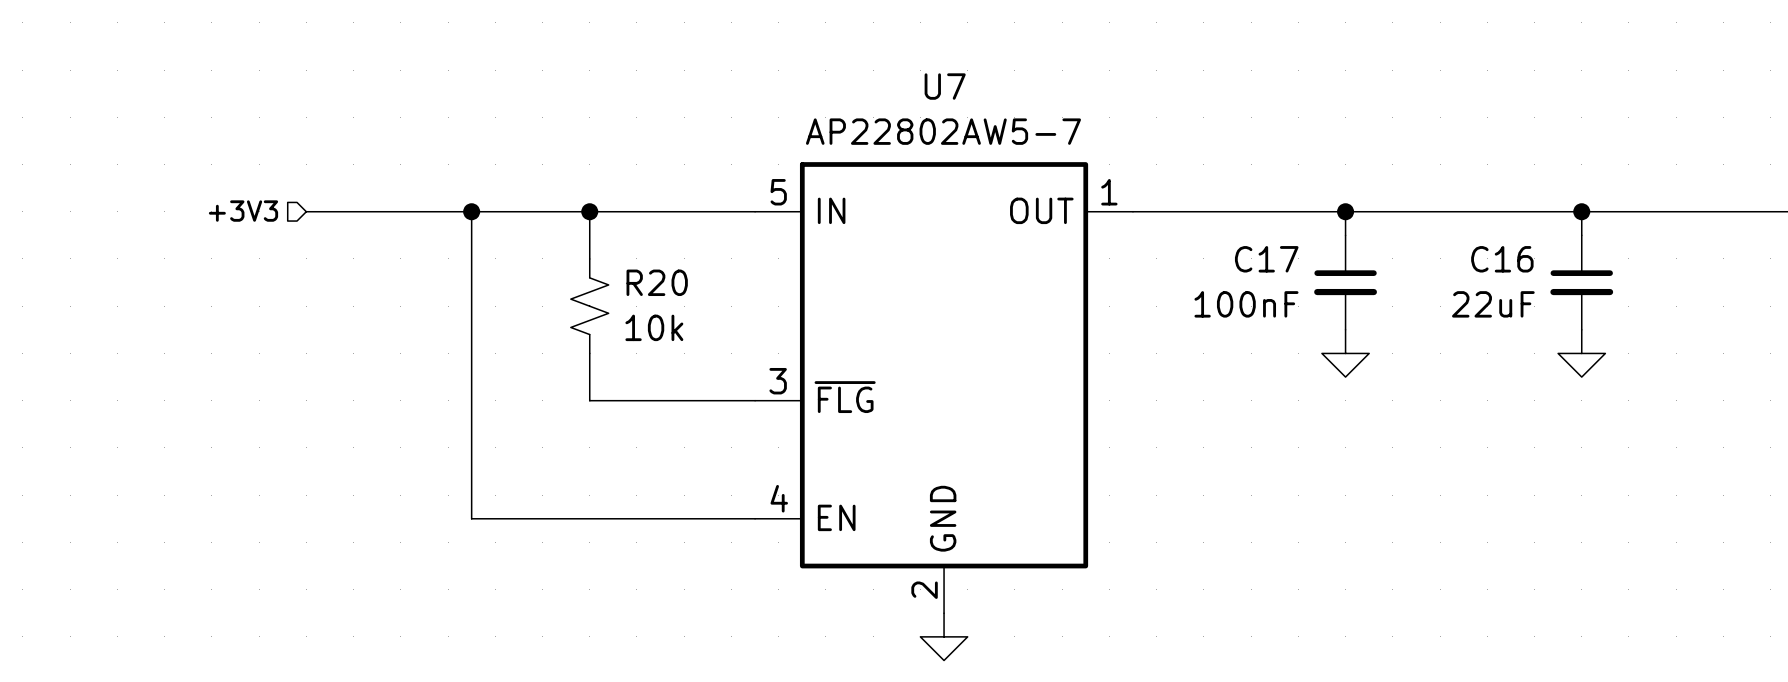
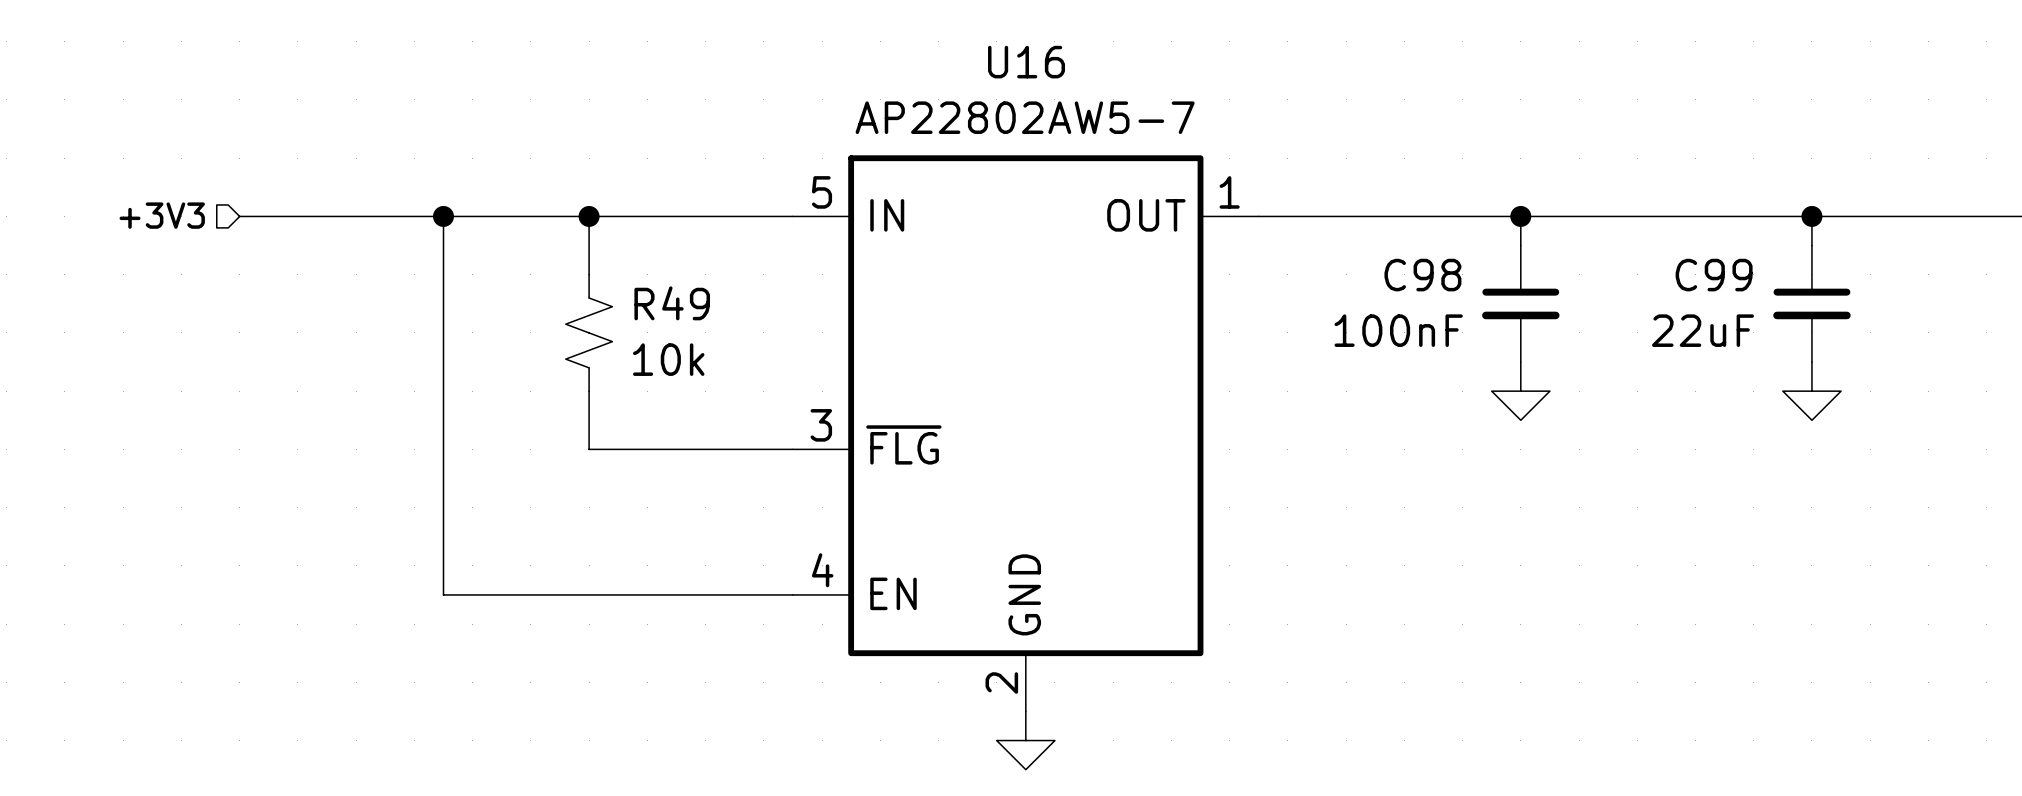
U7 name: U7 (945, 86) -> U16 (1026, 62)
C17 name: C17 (1266, 259) -> C98 (1422, 275)
C16 name: C16 (1502, 259) -> C99 (1714, 275)
R20 name: R20 (657, 282) -> R49 (672, 303)

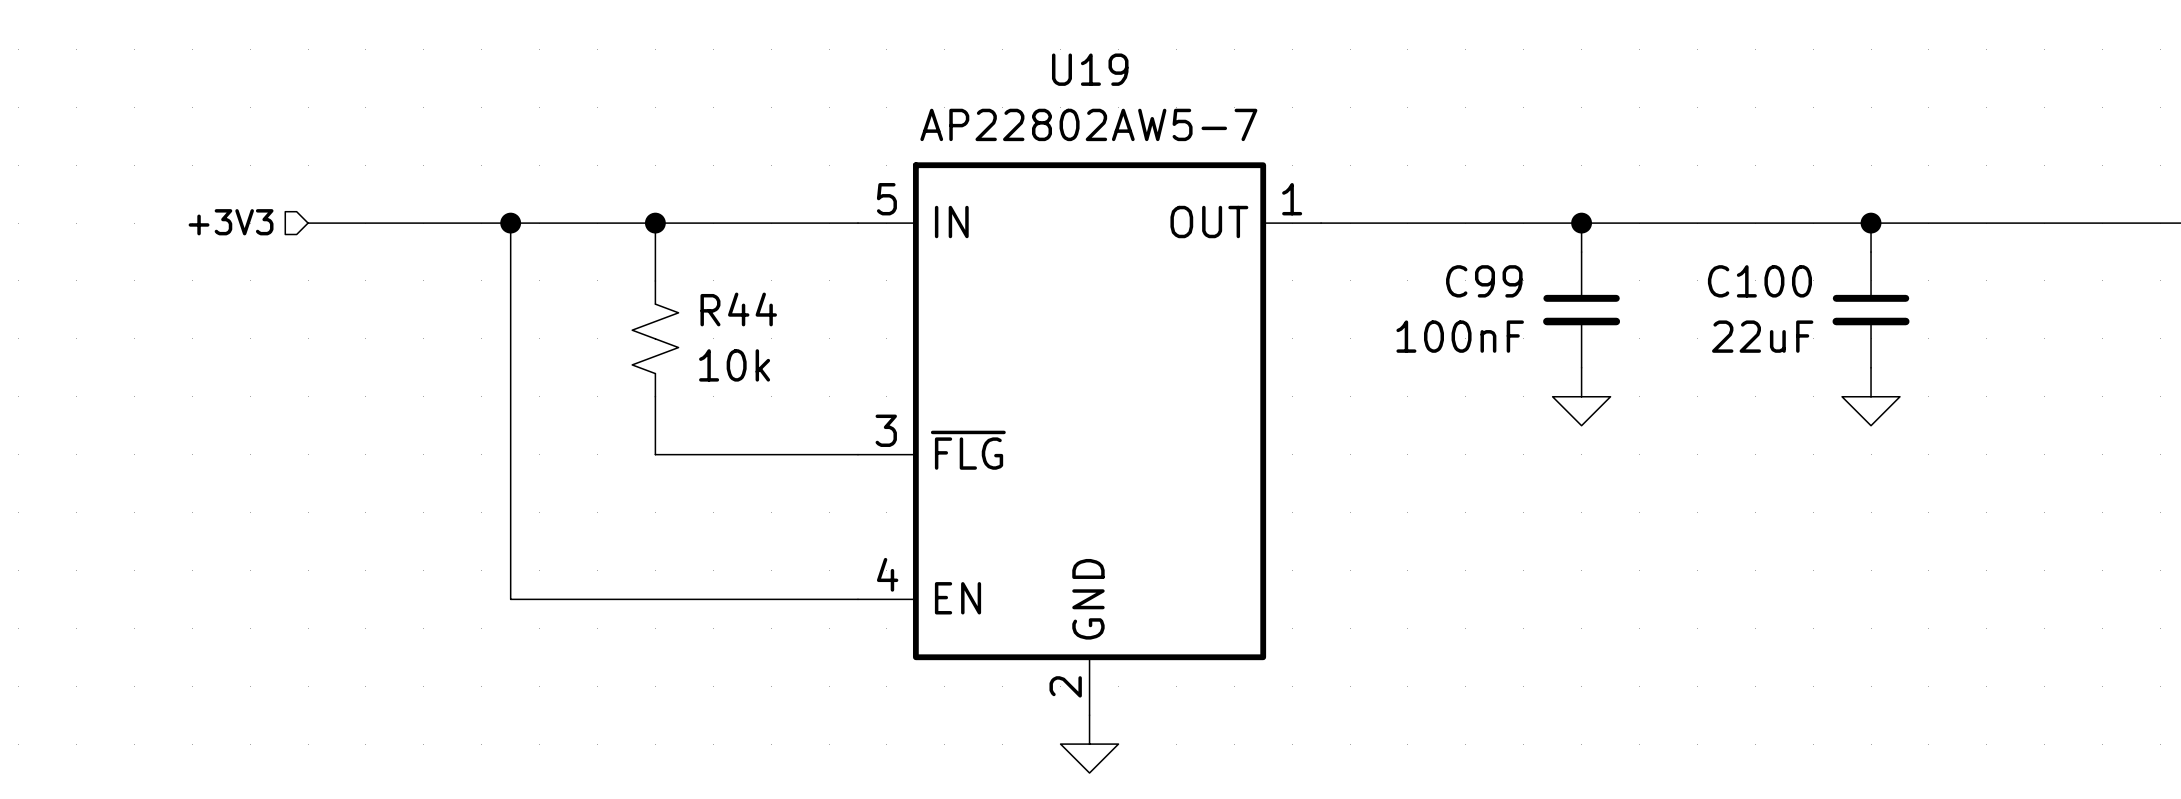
U16 name: U16 (1026, 62) -> U19 (1090, 69)
C98 name: C98 (1422, 275) -> C99 (1484, 281)
C99 name: C99 (1714, 275) -> C100 (1759, 281)
R49 name: R49 (672, 303) -> R44 (738, 309)

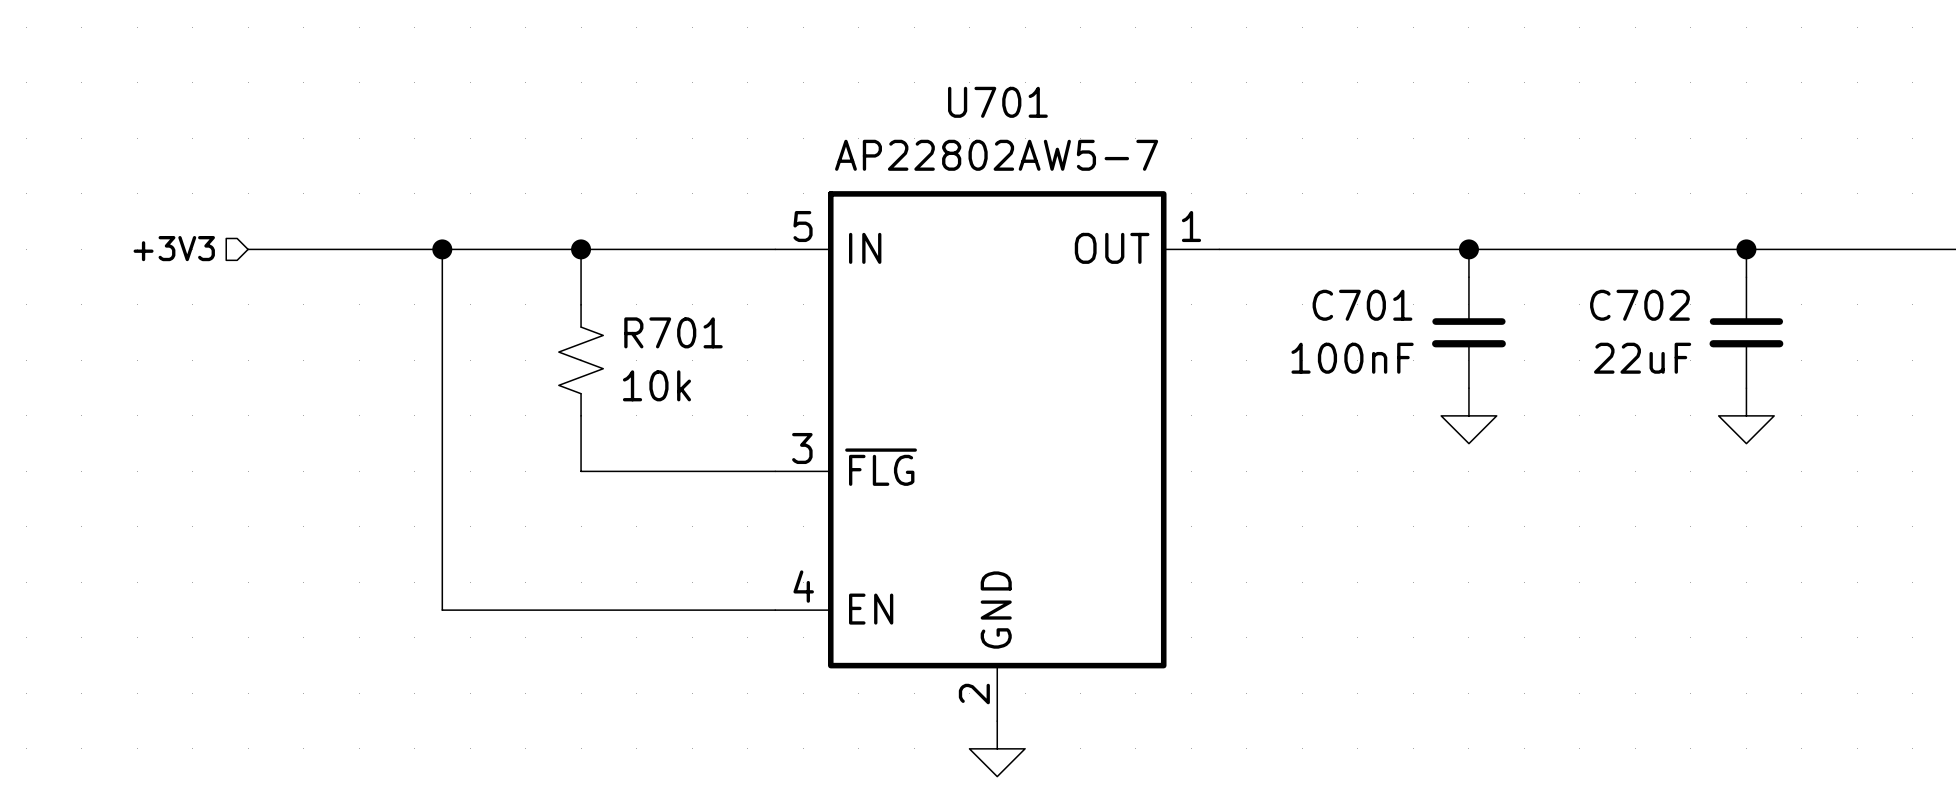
U19 name: U19 (1090, 69) -> U701 (997, 102)
C99 name: C99 (1484, 281) -> C701 (1362, 305)
C100 name: C100 (1759, 281) -> C702 (1639, 305)
R44 name: R44 (738, 309) -> R701 (673, 332)

